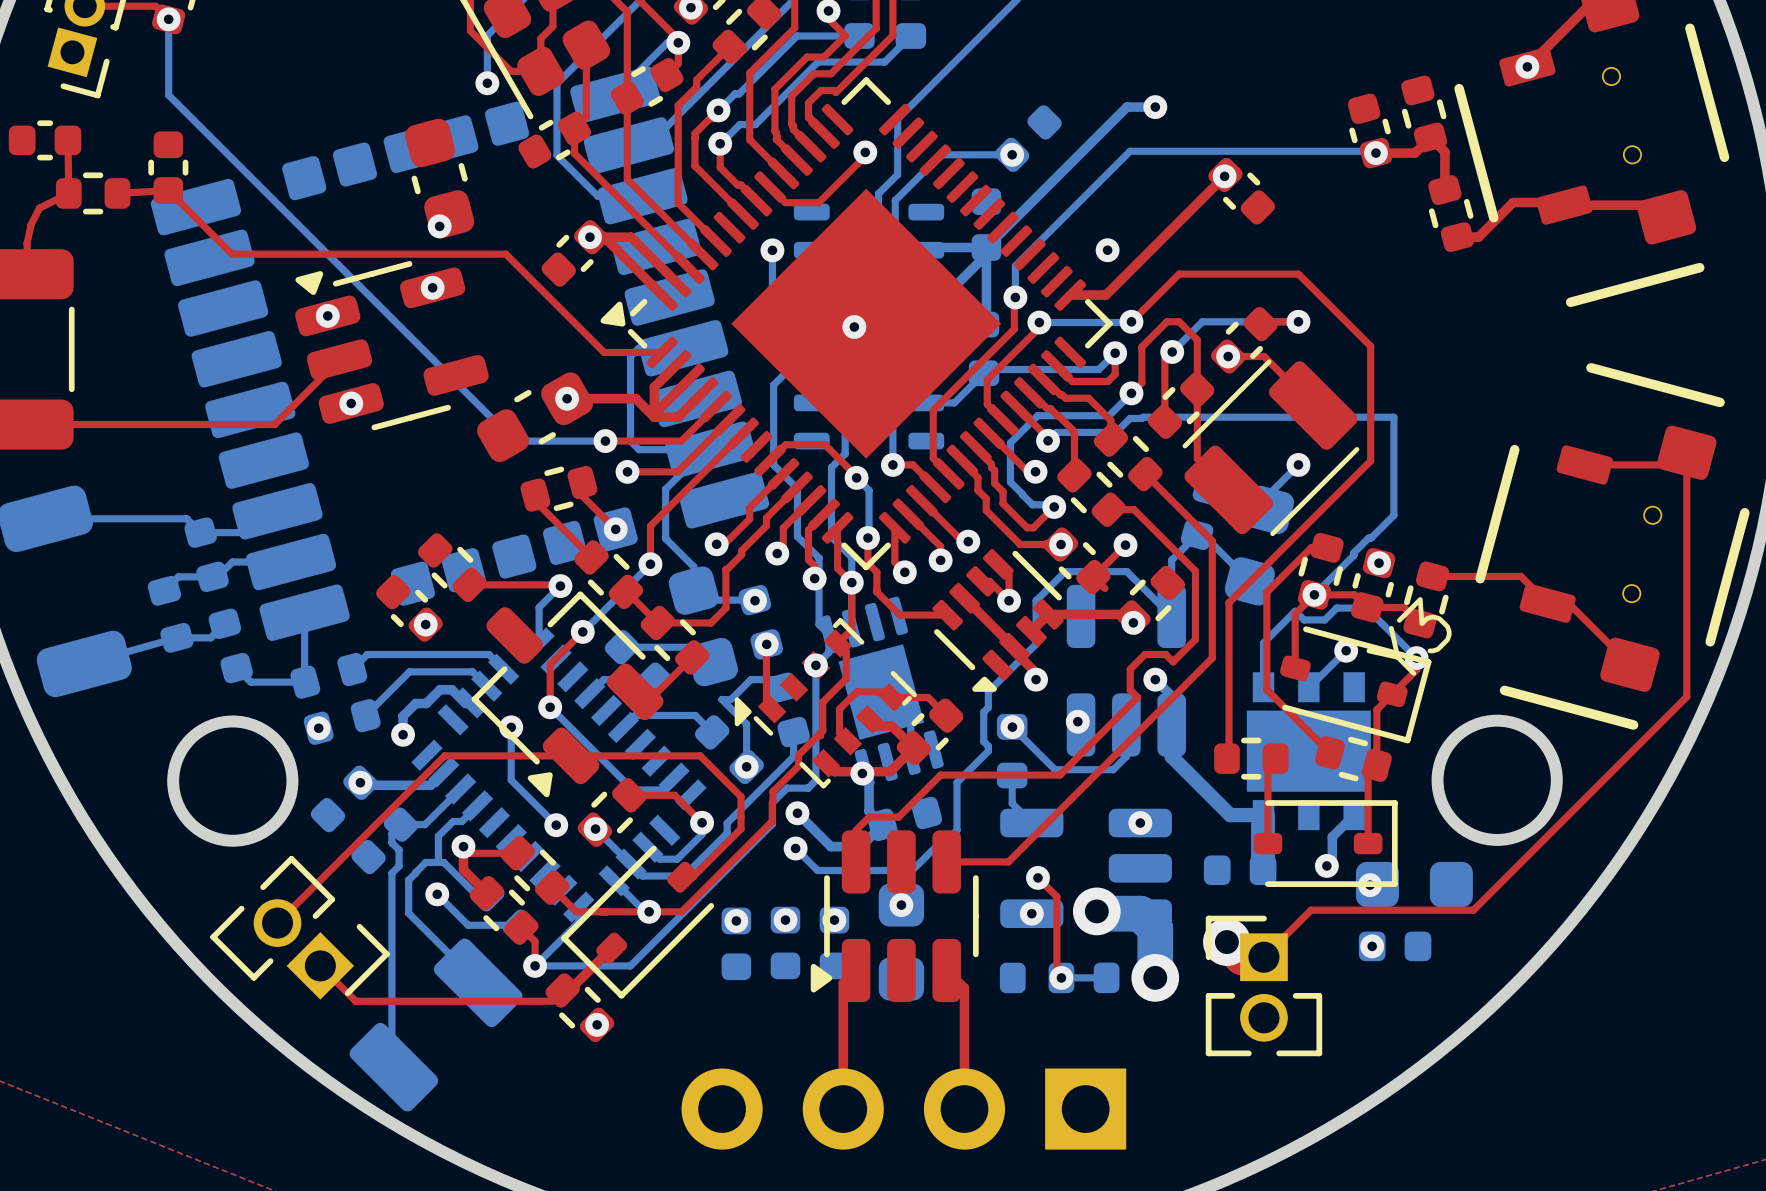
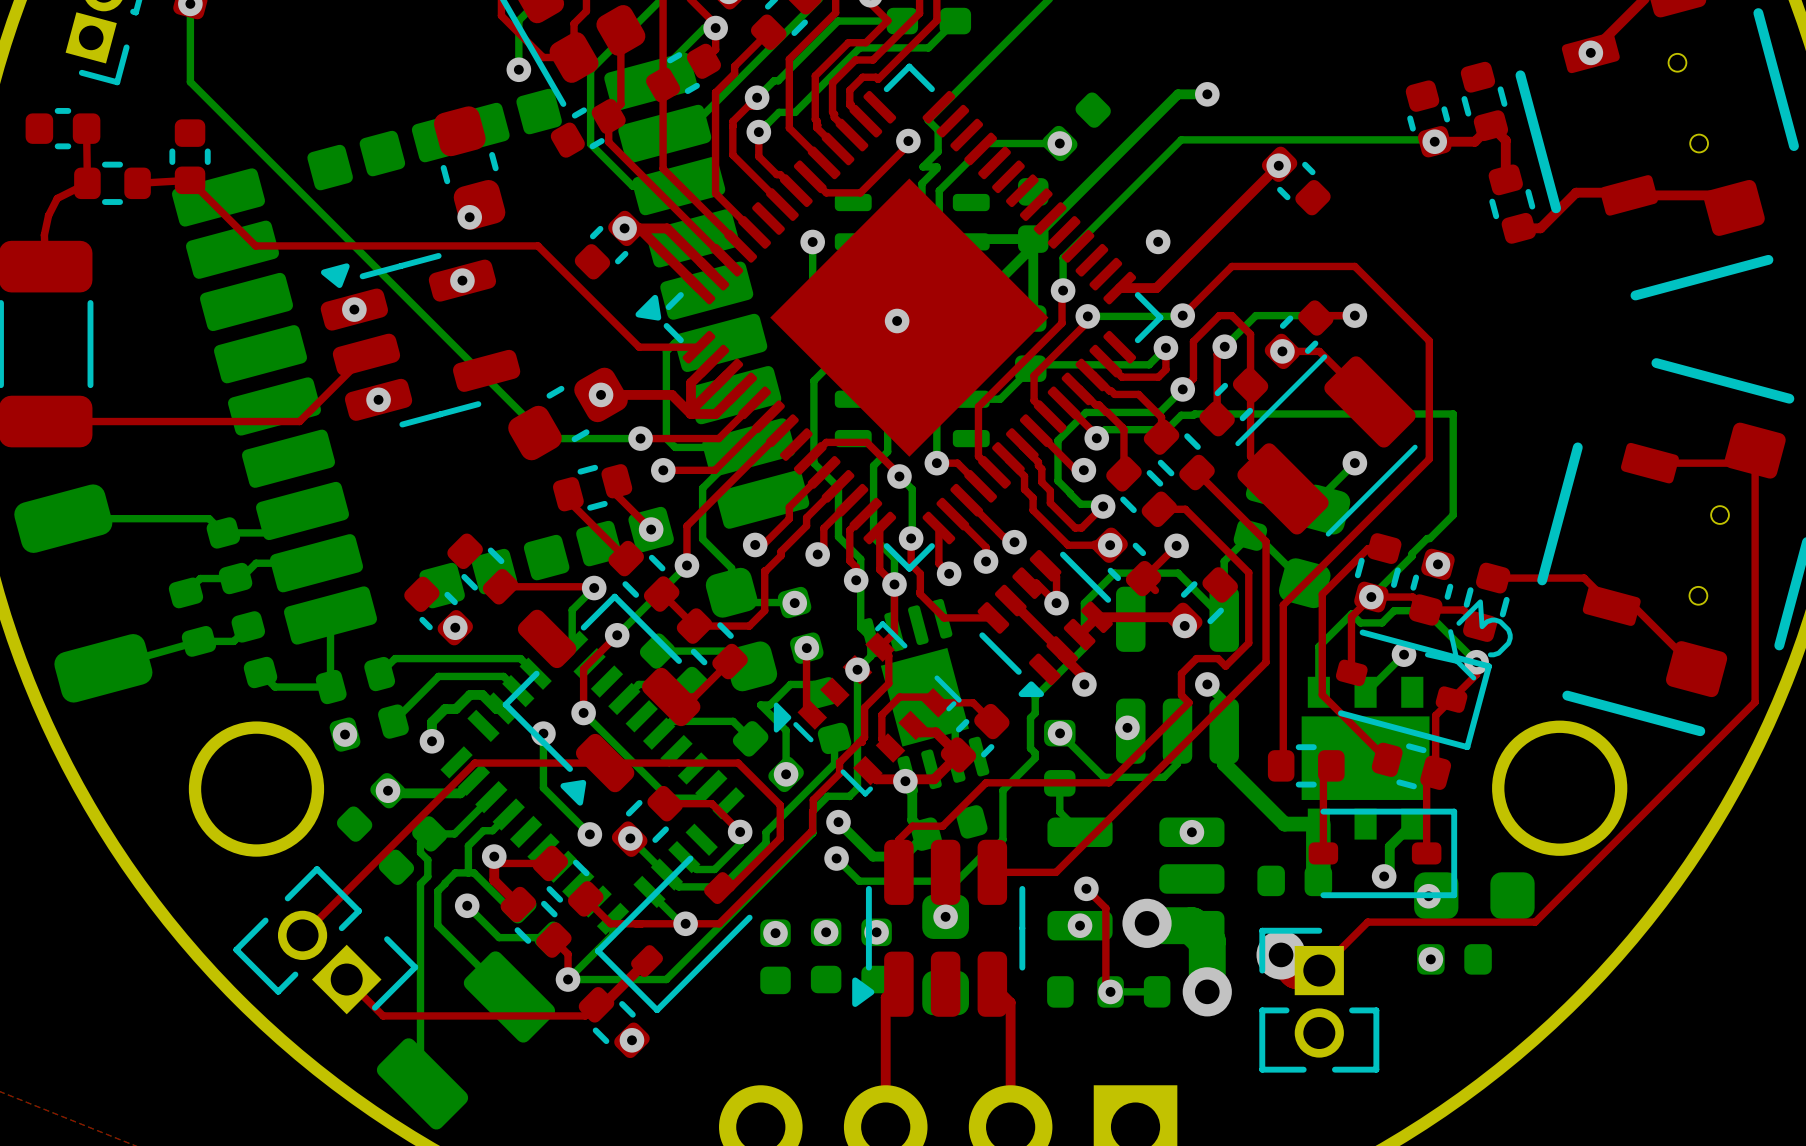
bottom track: (897, 119) (897, 174) (892, 179) -> (941, 106) (928, 120) (938, 130) (938, 151) (922, 166) (936, 166) (936, 168)

